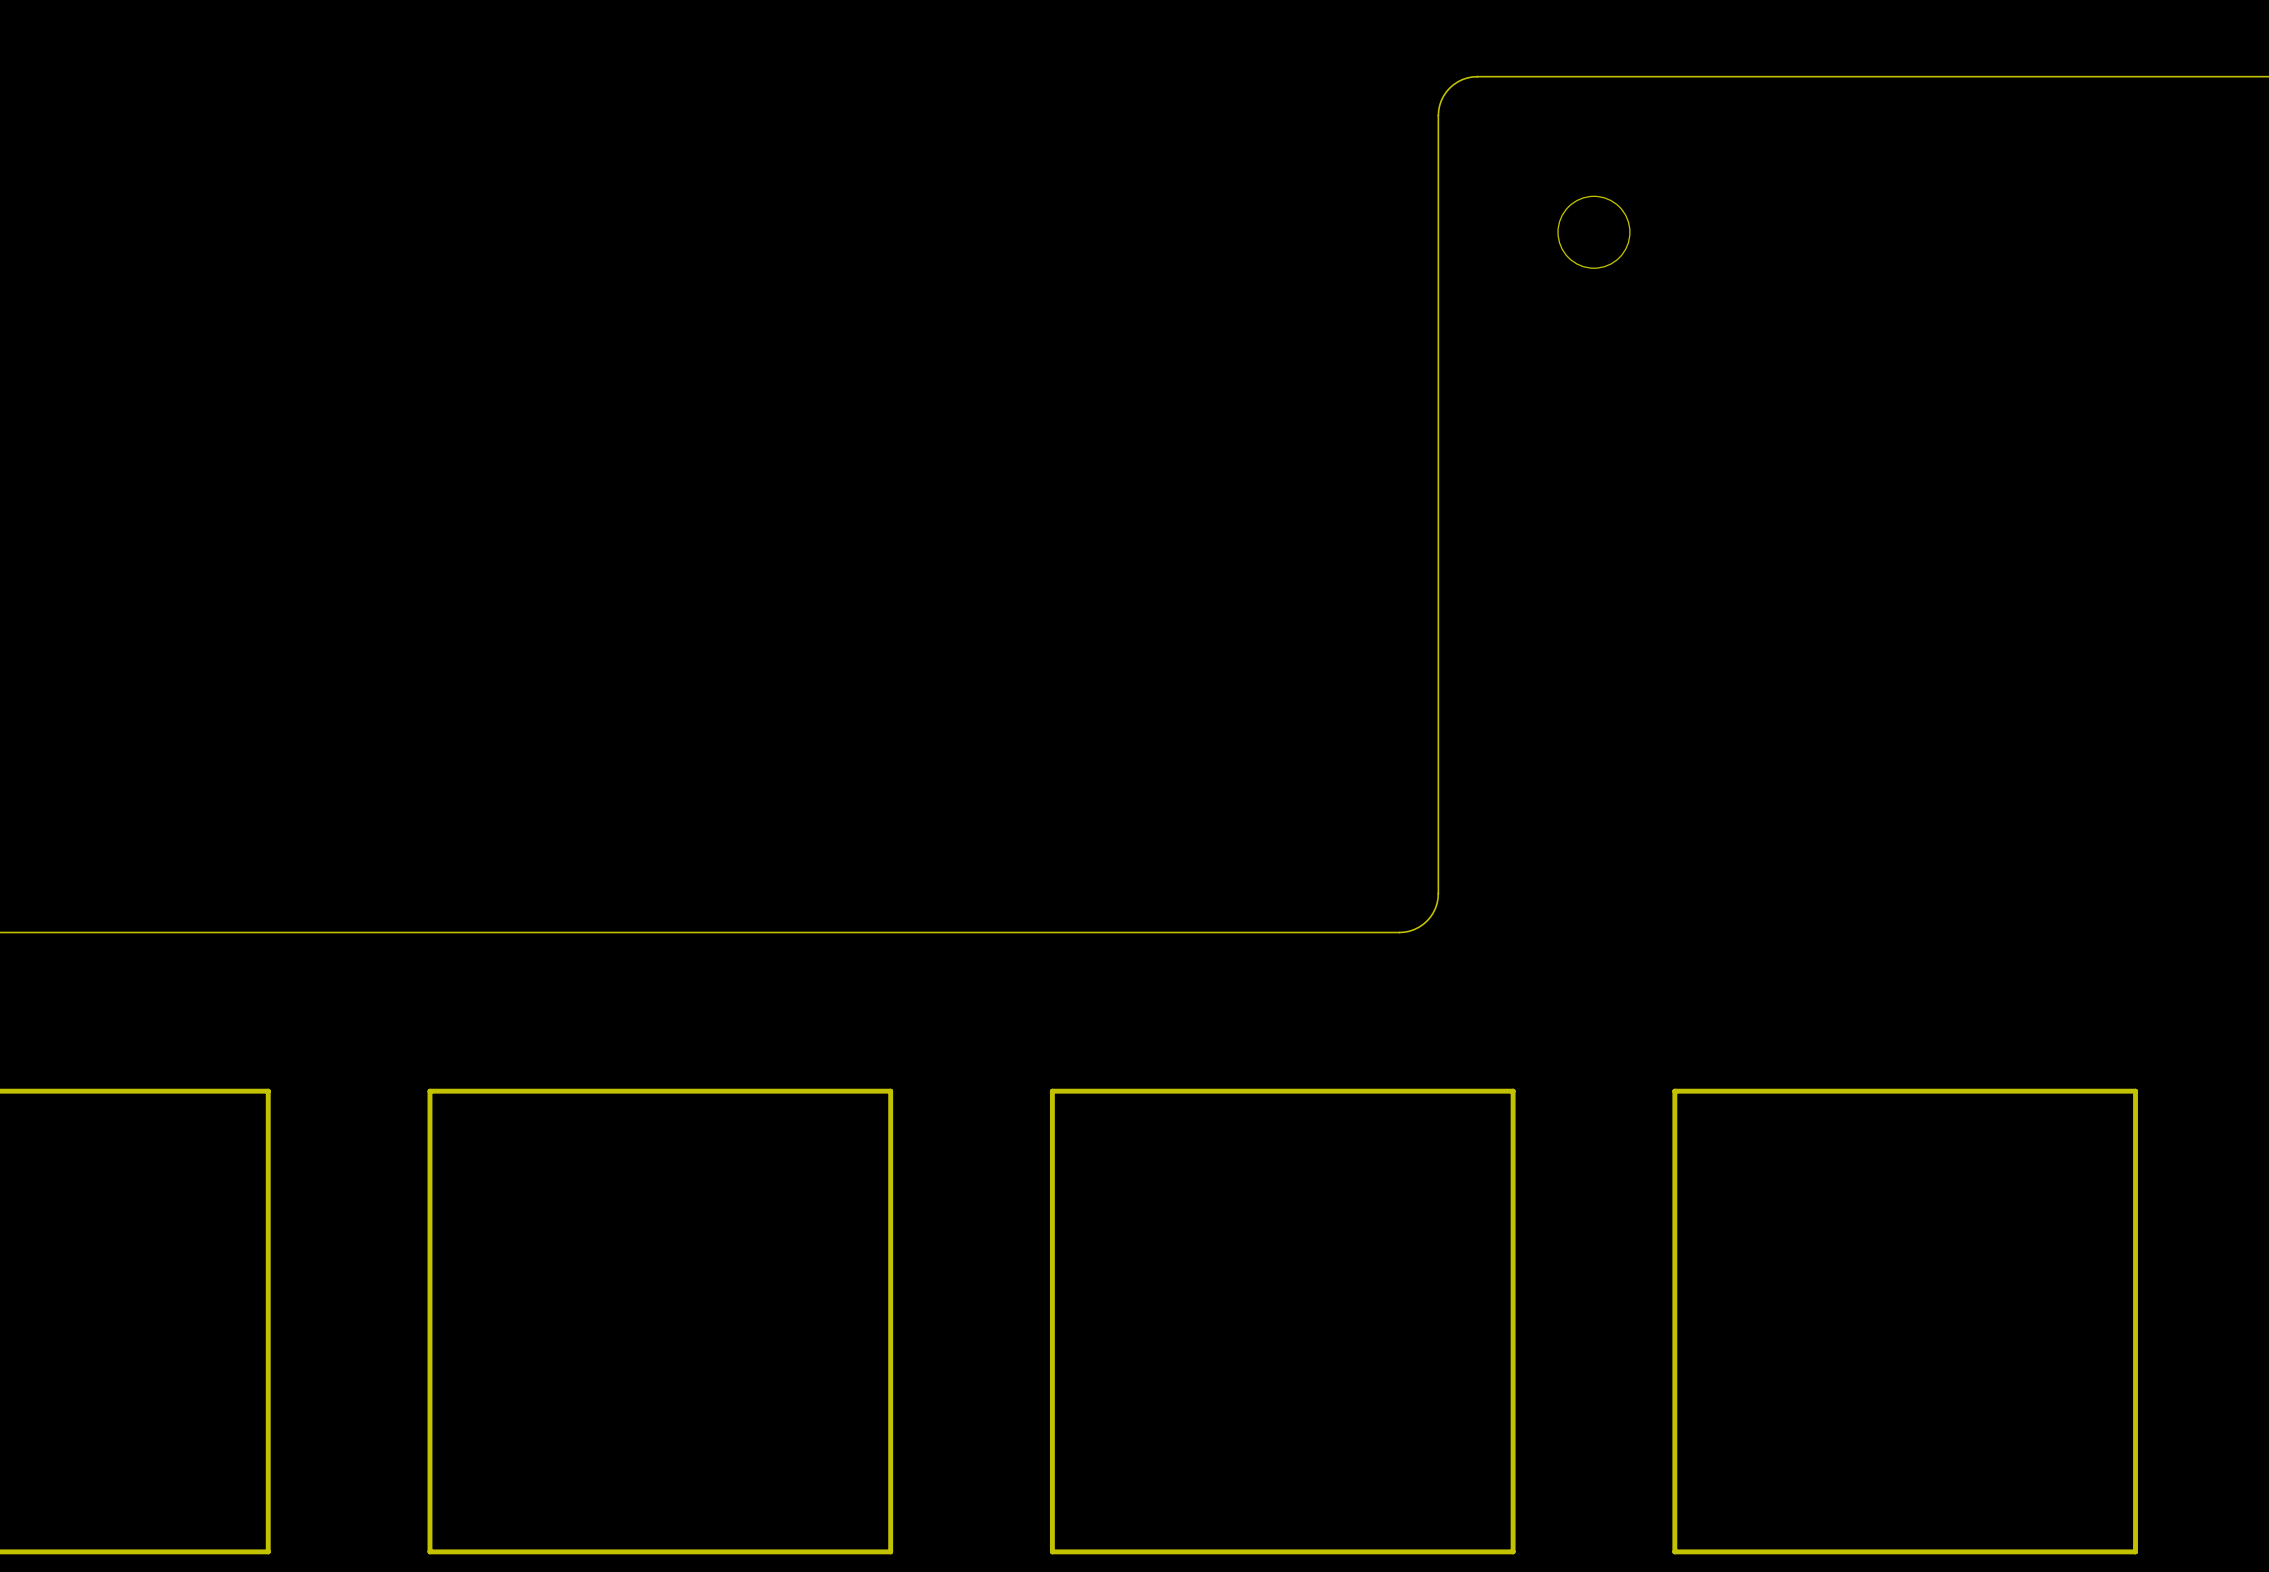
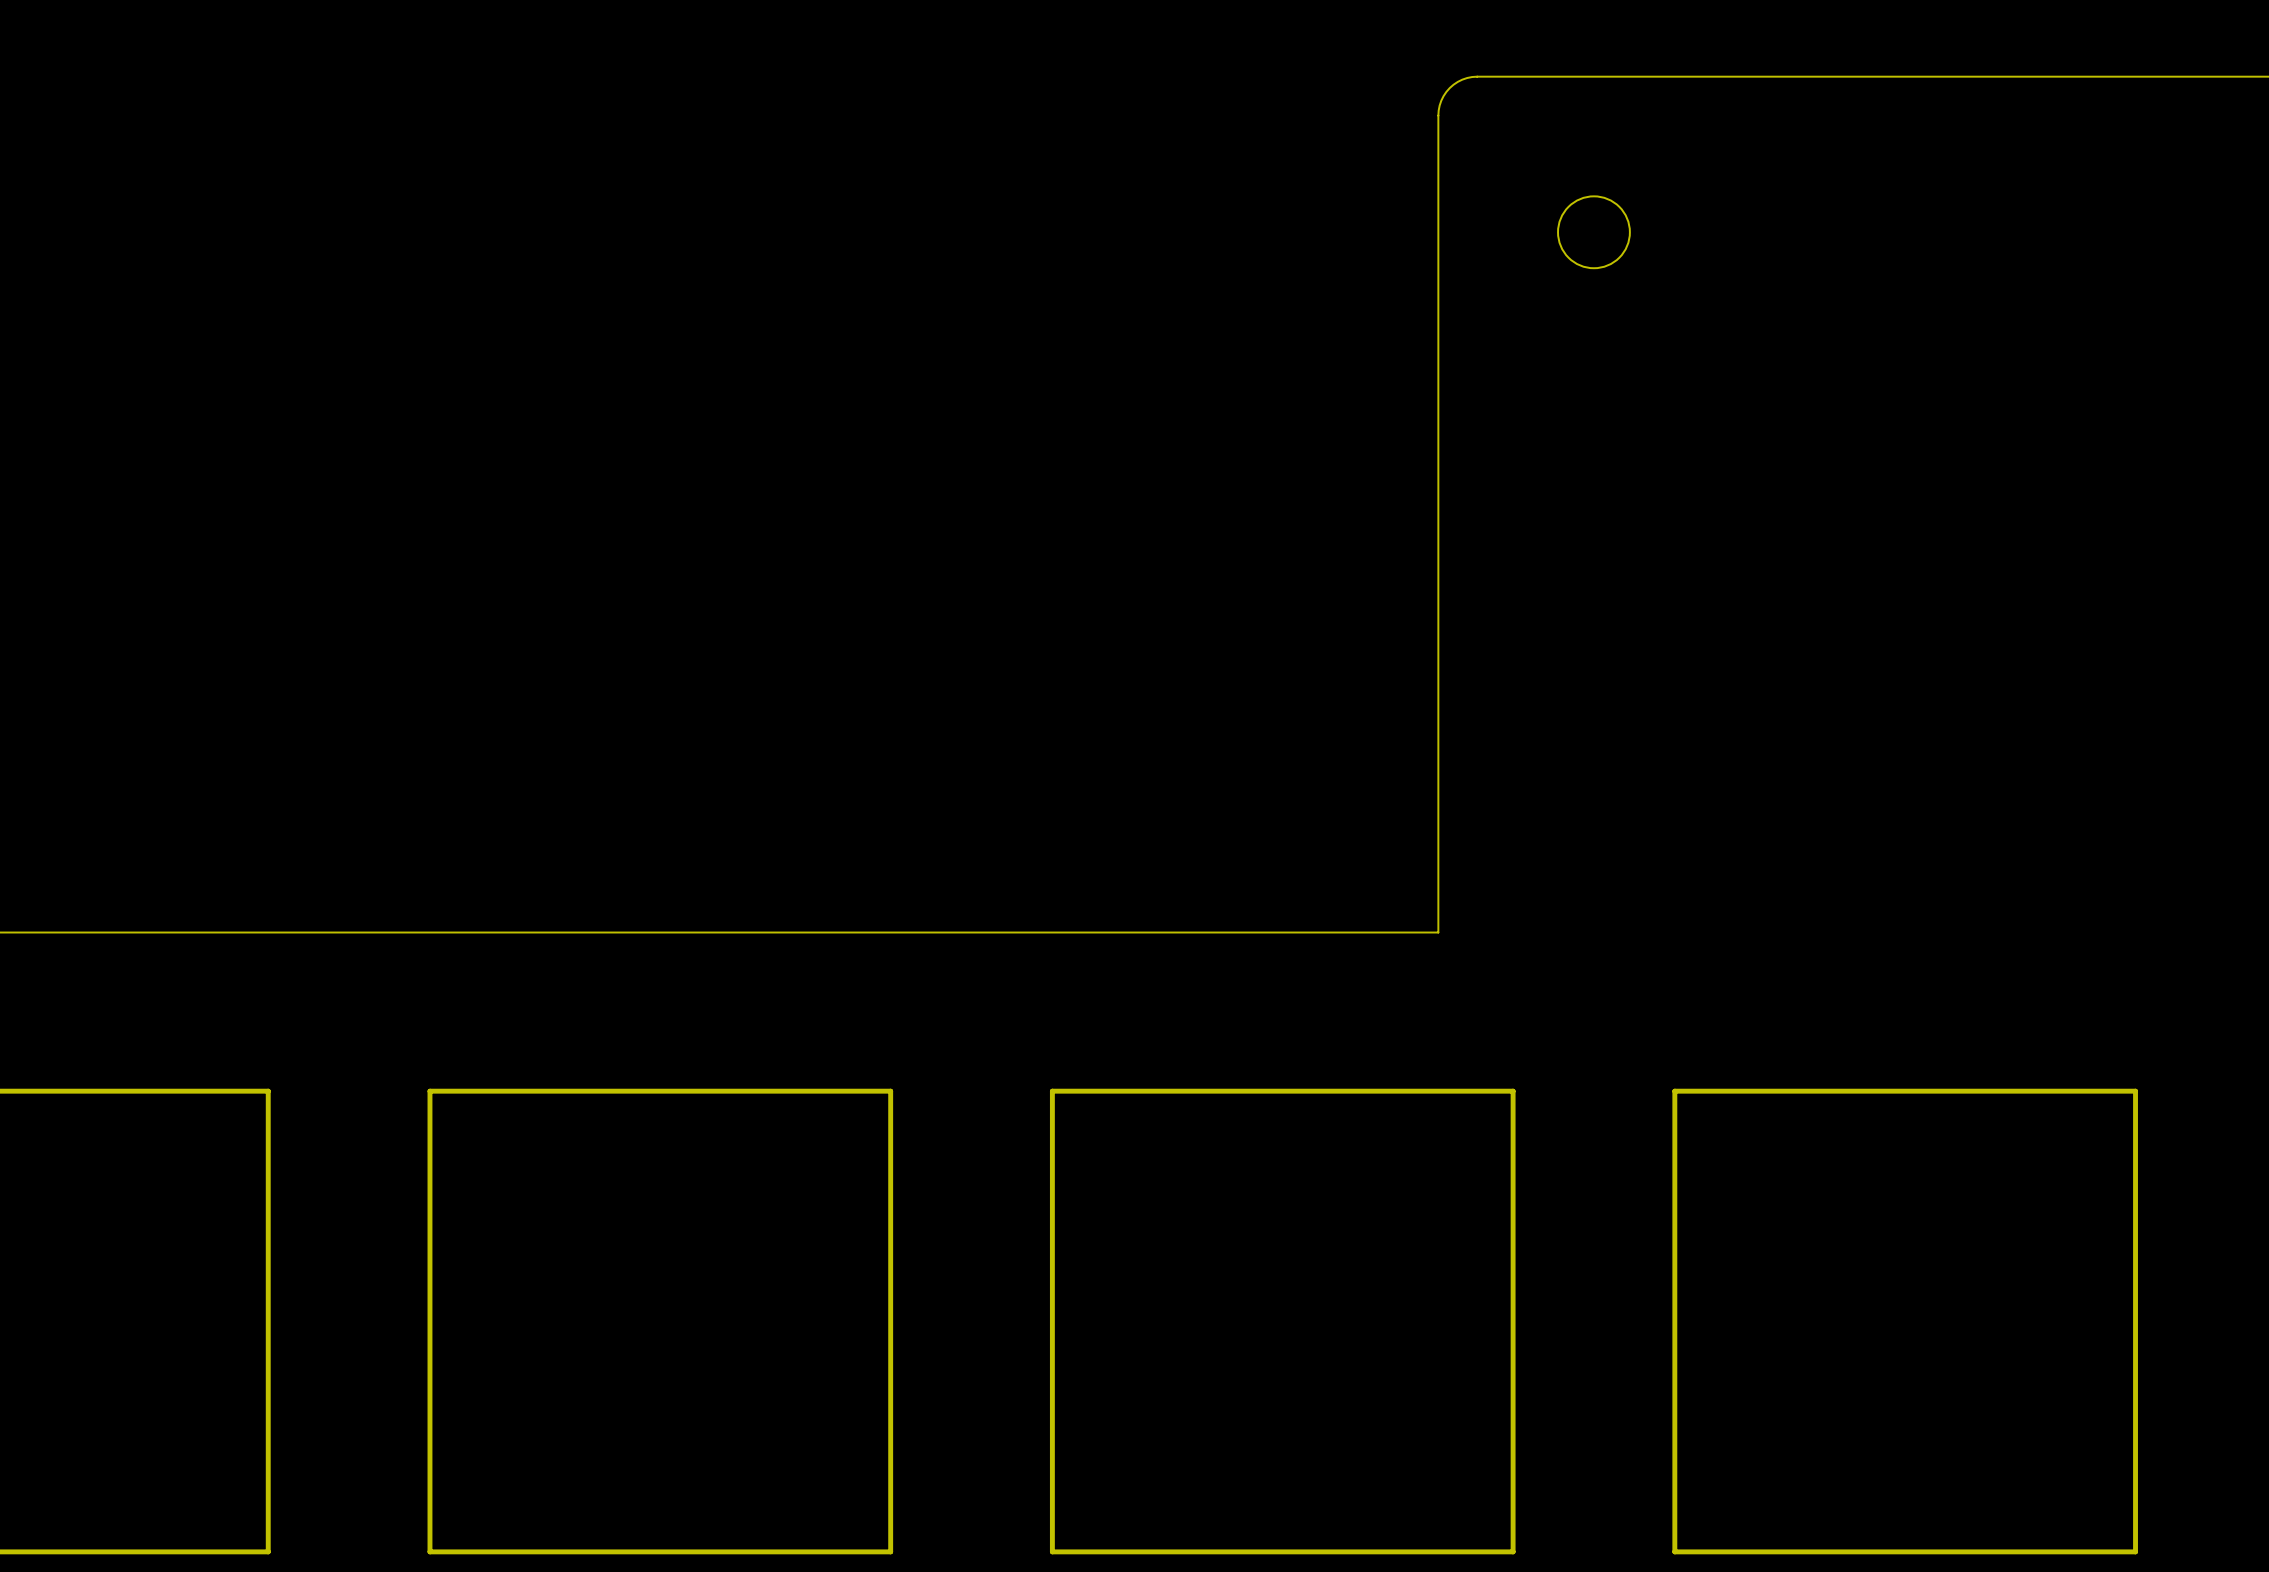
board edge: (1438, 893) (1435, 908) (1426, 921) (1414, 929) (1399, 932) -> (1438, 893) (1438, 932) (1399, 932)

